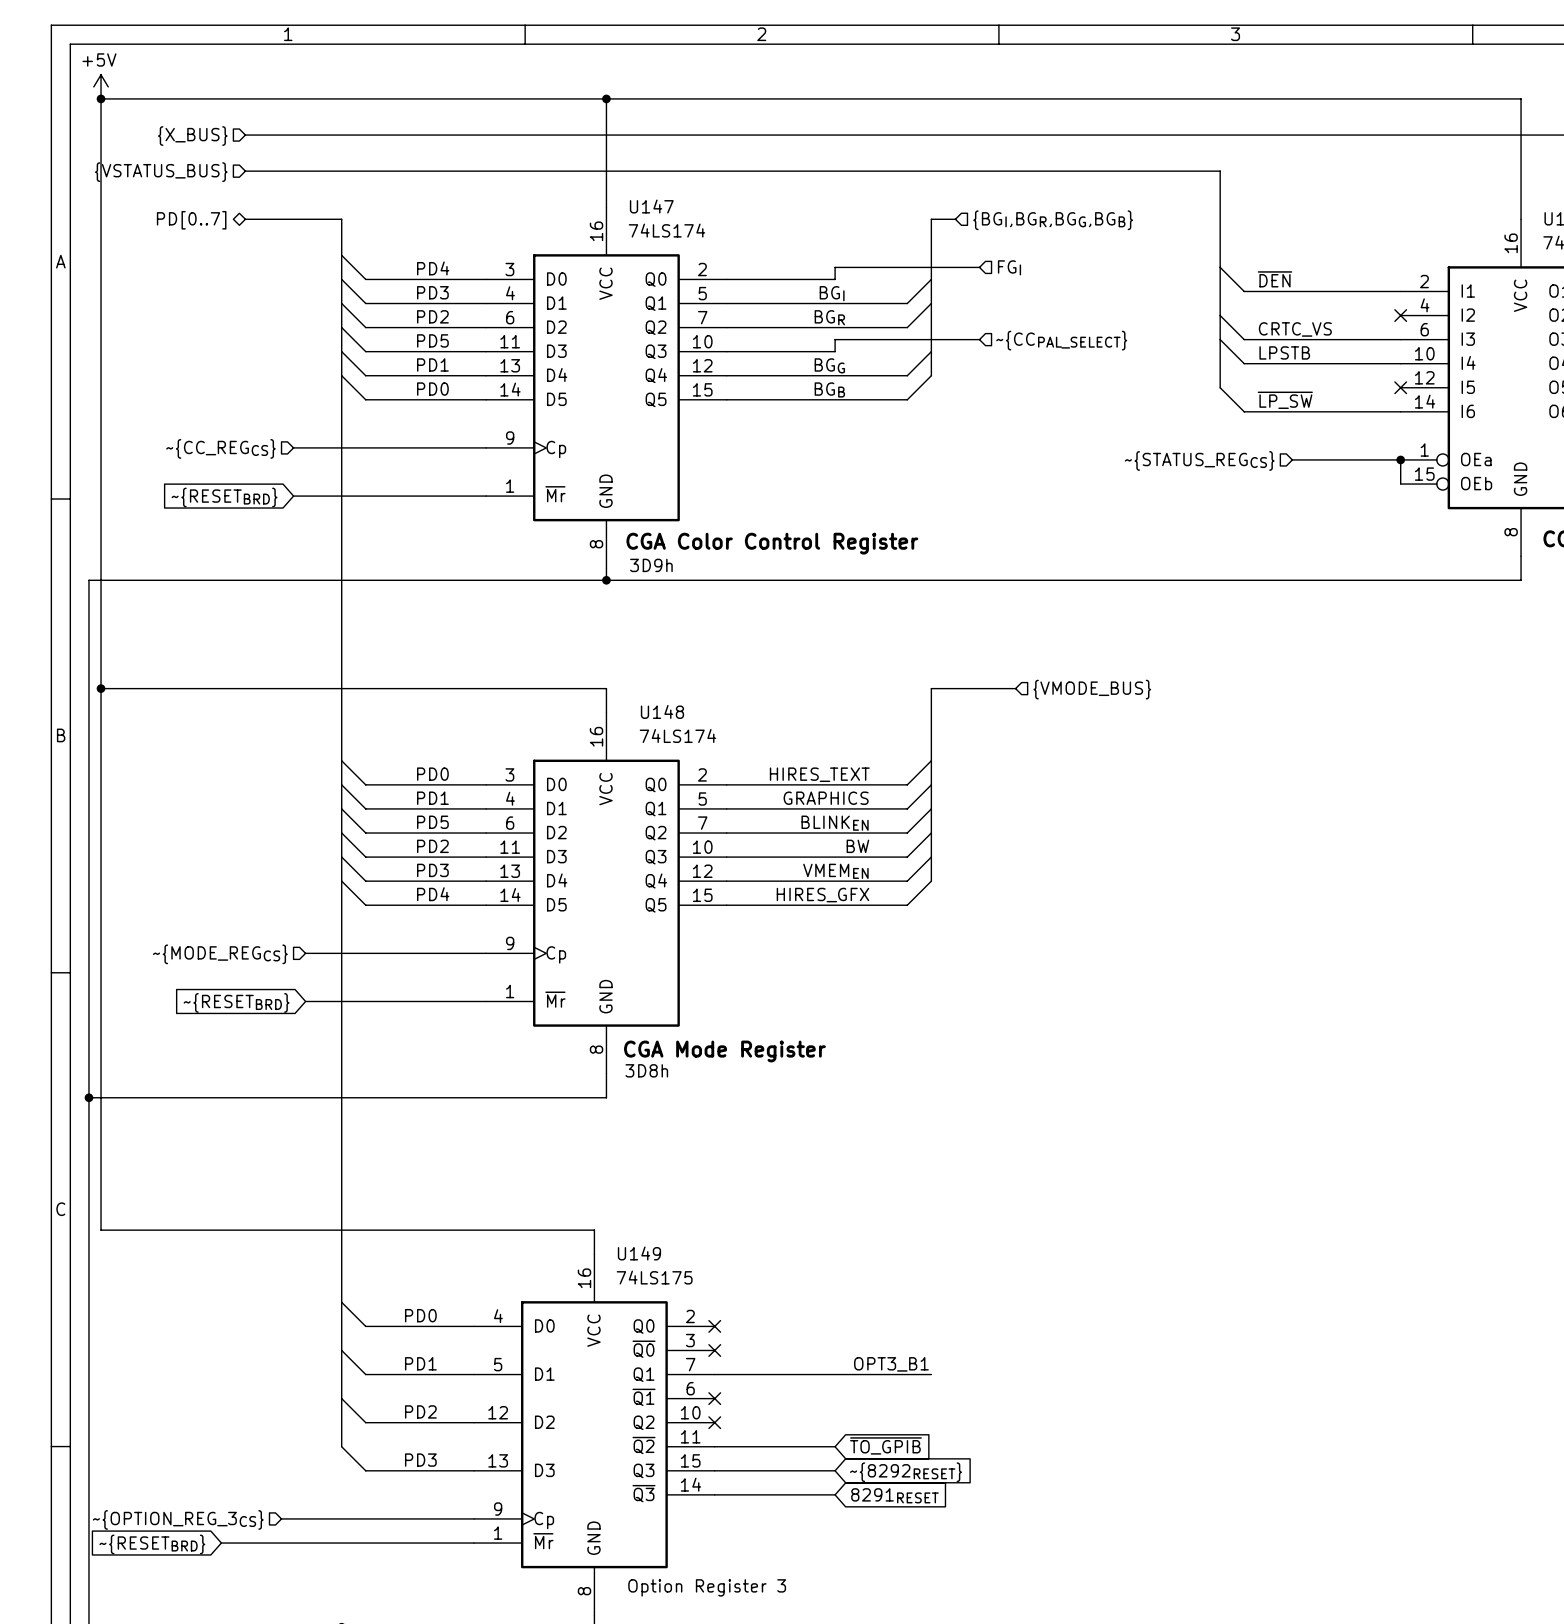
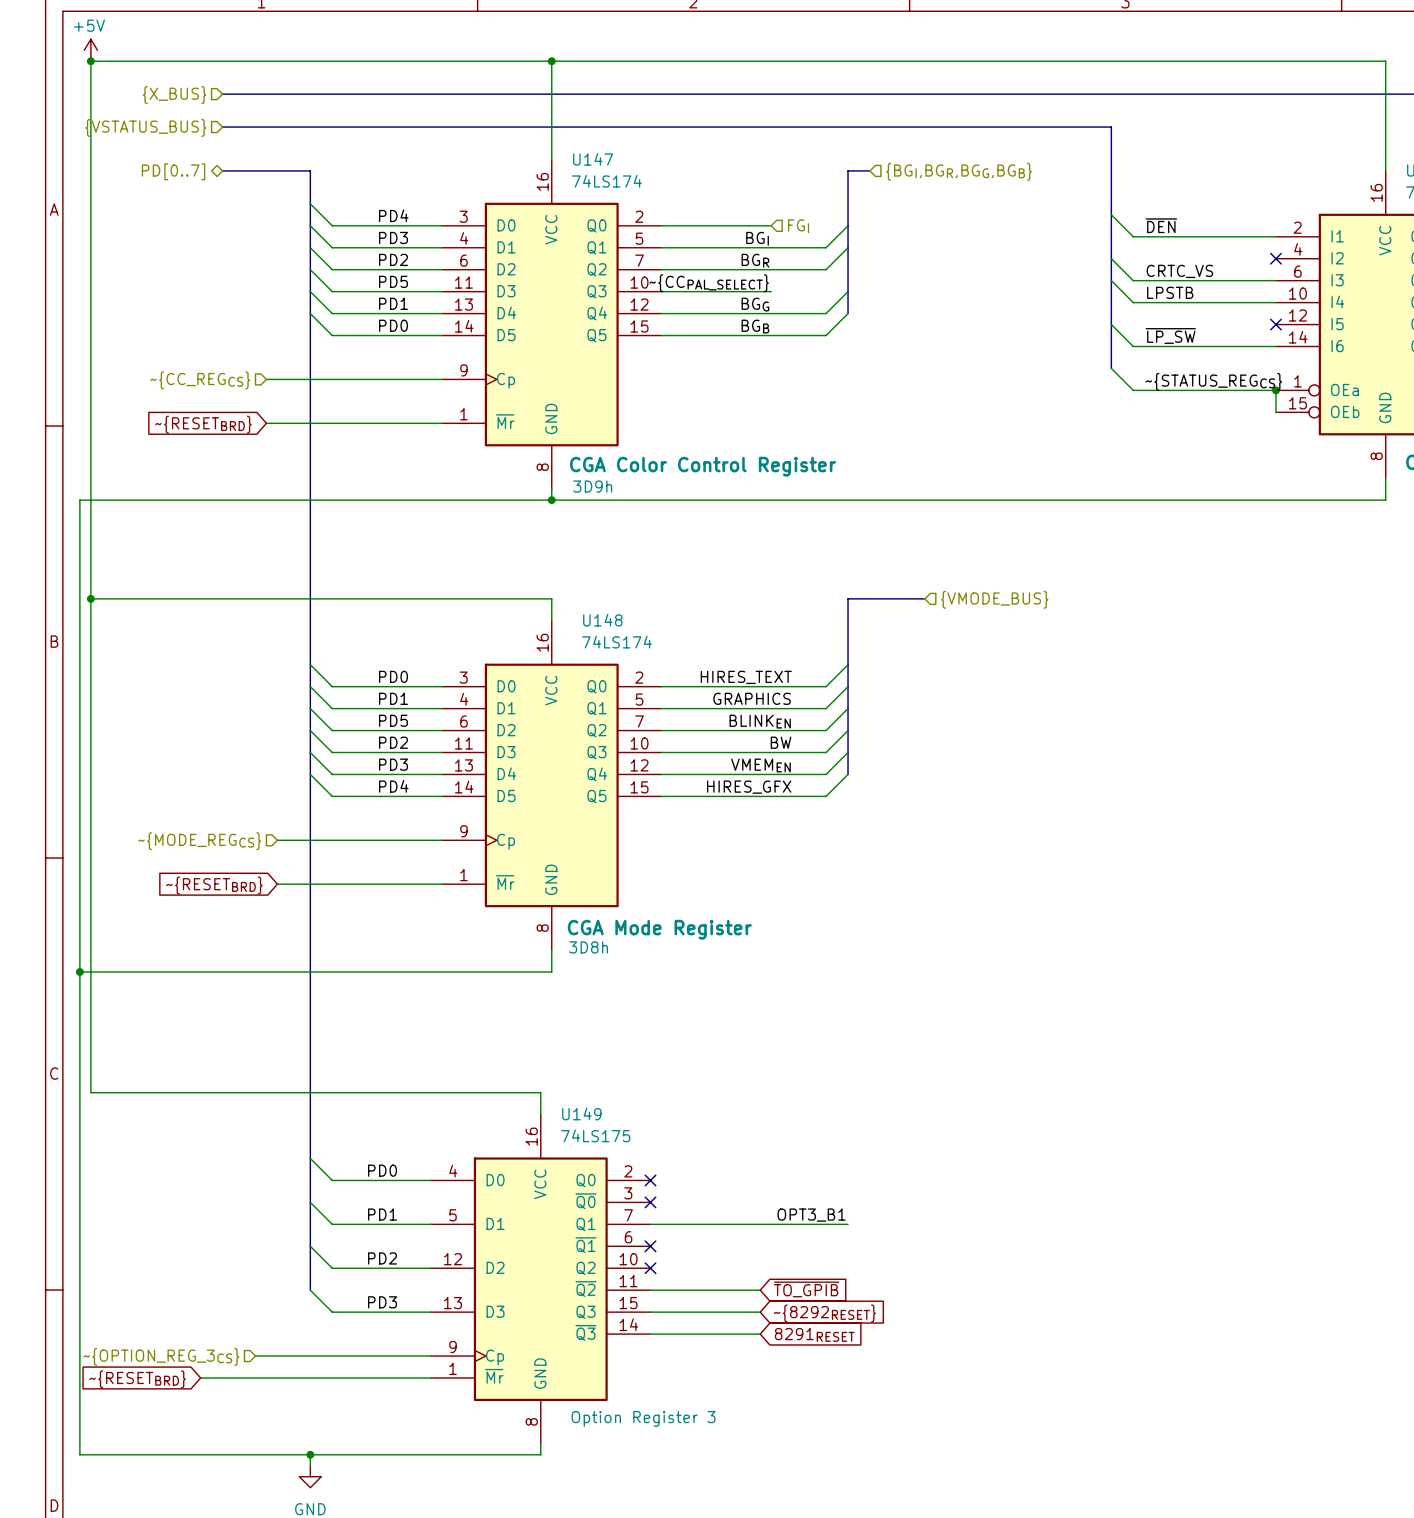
wire: (979, 267) (835, 267) (835, 279) -> (771, 225) (760, 225)
hierarchical label position: FGI (1009, 267) -> FGI (798, 226)
wire: (979, 339) (835, 339) (835, 351) -> (771, 291) (760, 291)
hierarchical label: ~{CCPAL_SELECT} (1061, 340) -> none
label: none -> ~{CCPAL_SELECT} (709, 283)
bus: none -> (1111, 324) (1111, 368)
wire: none -> (1111, 368) (1133, 390) (1177, 390)
label: none -> ~{STATUS_REGCS} (1213, 381)
hierarchical label: ~{STATUS_REGCS} (1199, 460) -> none

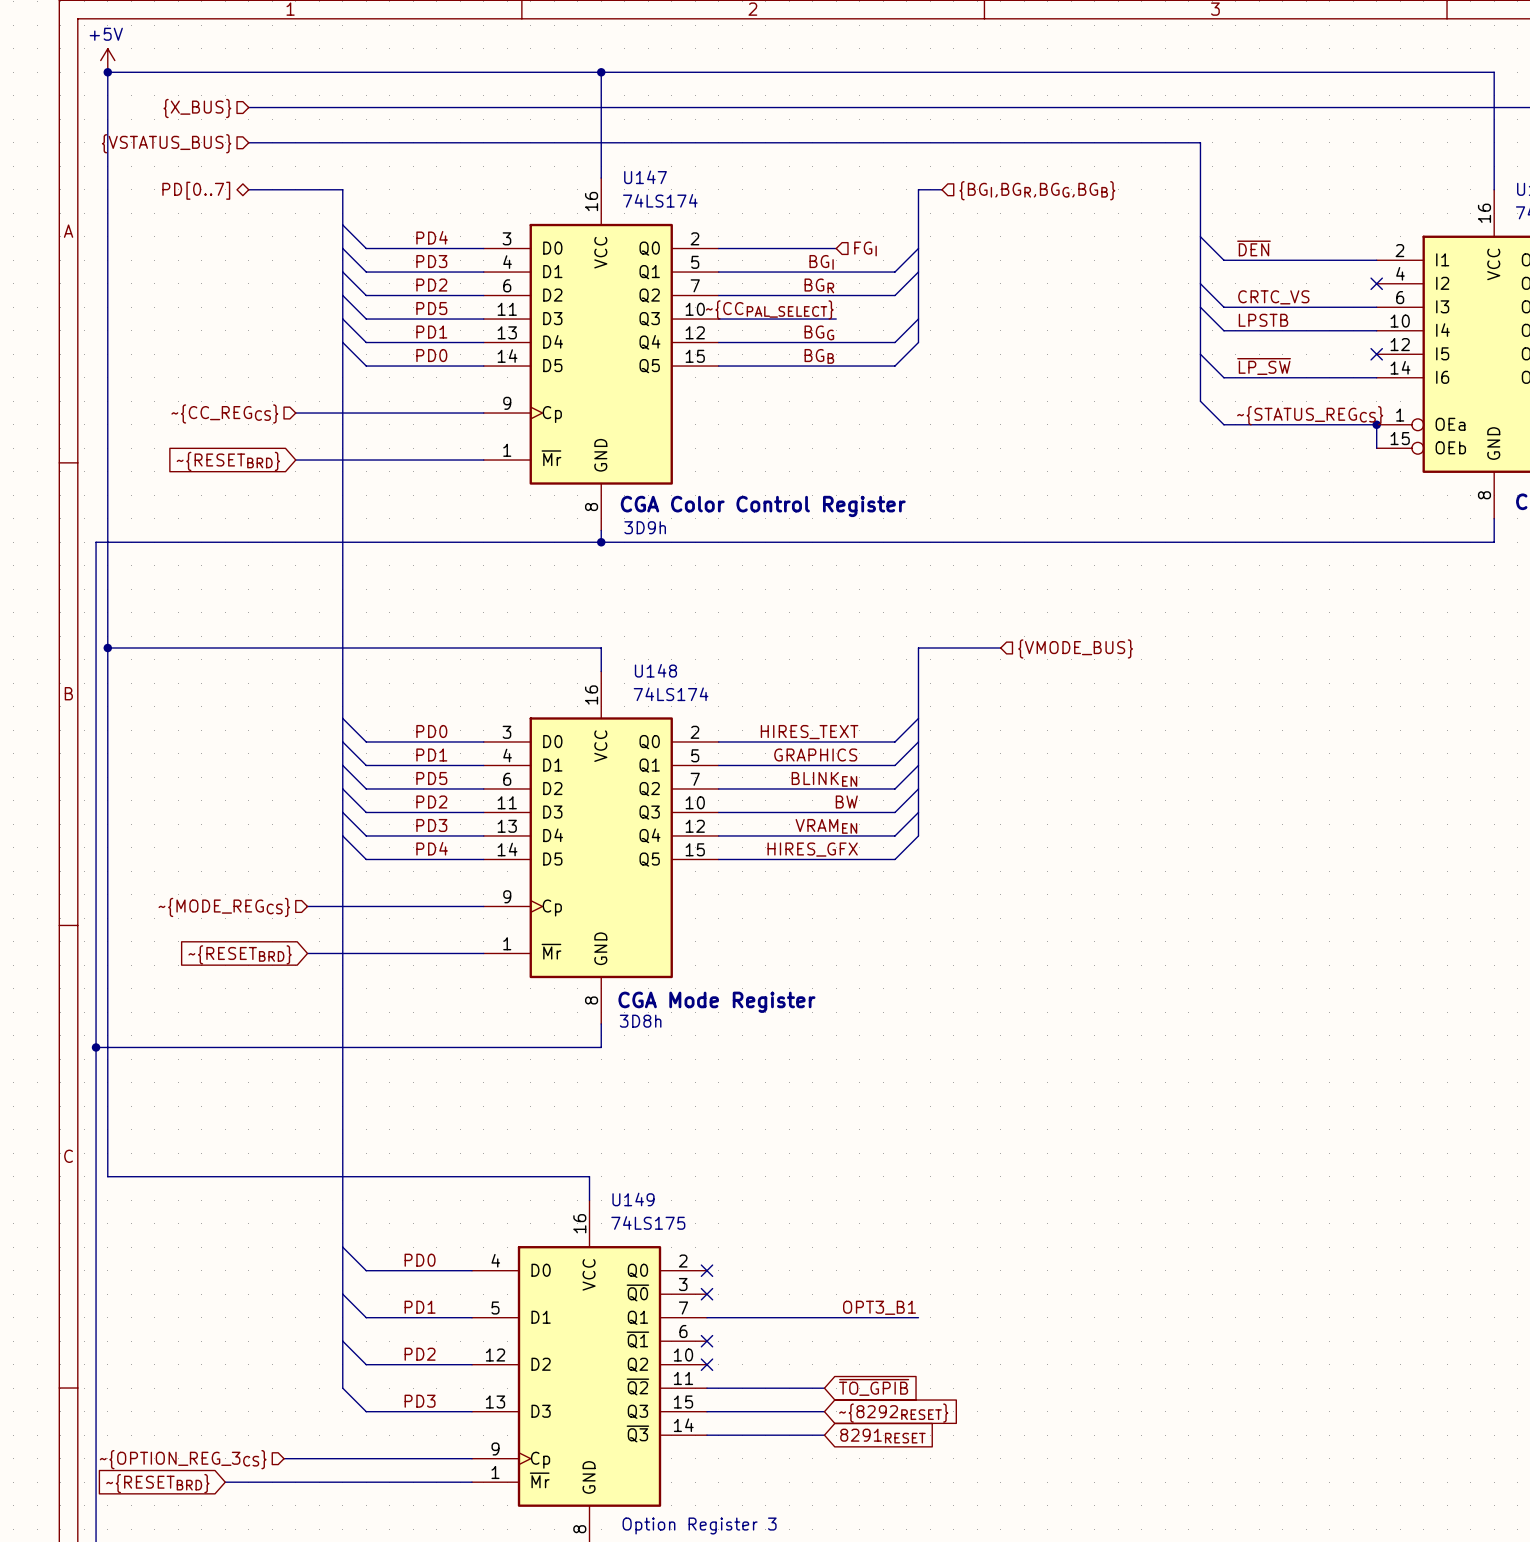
label: VMEMEN (760, 765) -> VRAMEN (826, 826)

